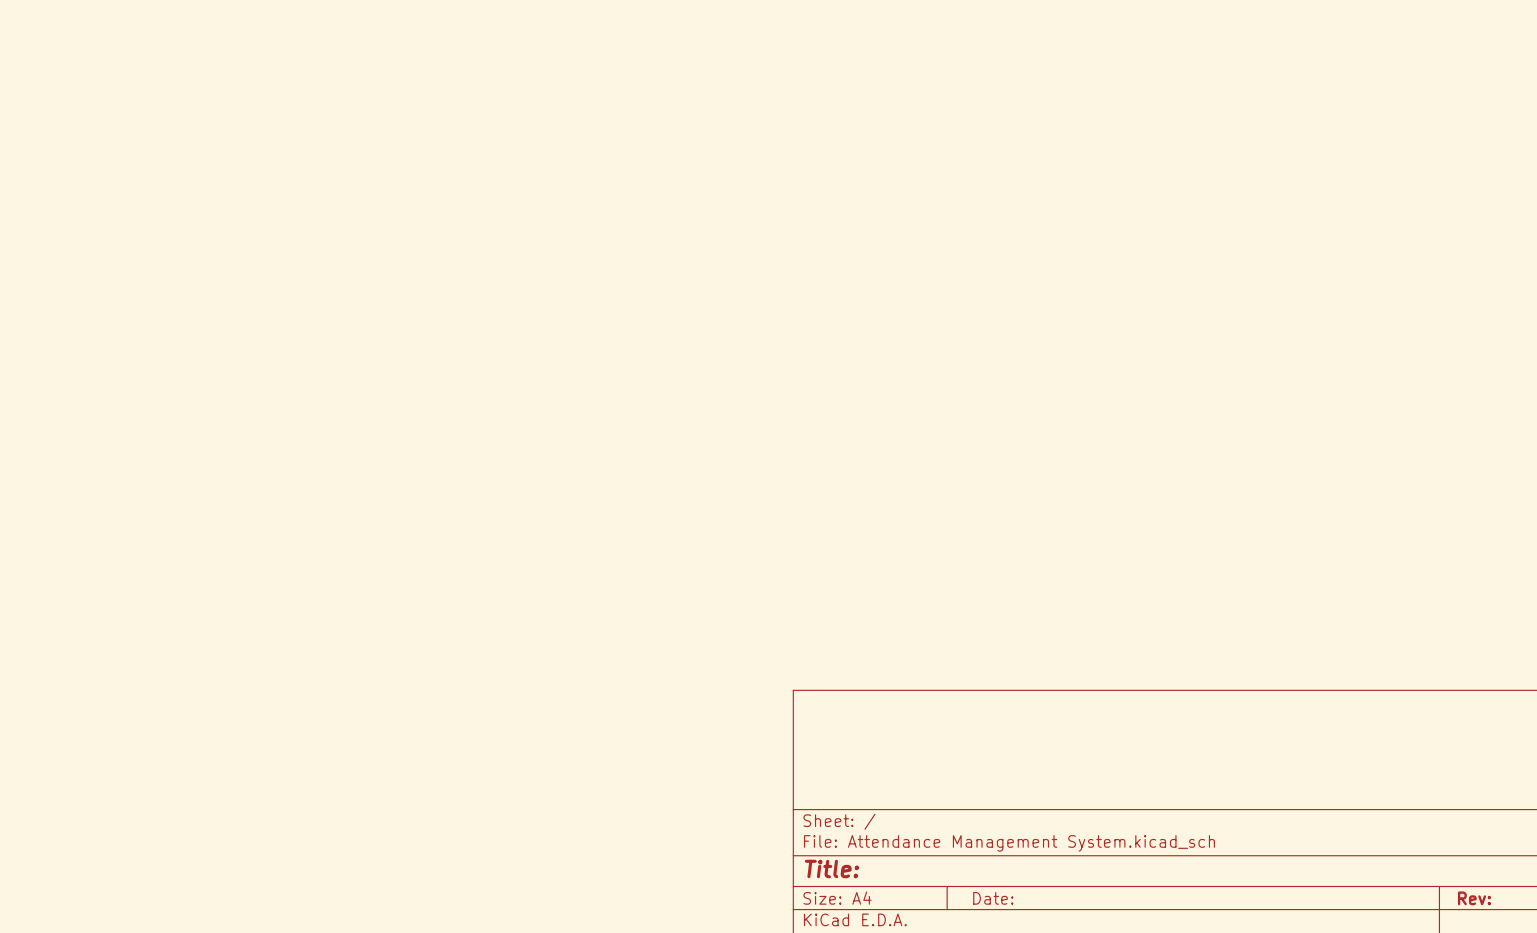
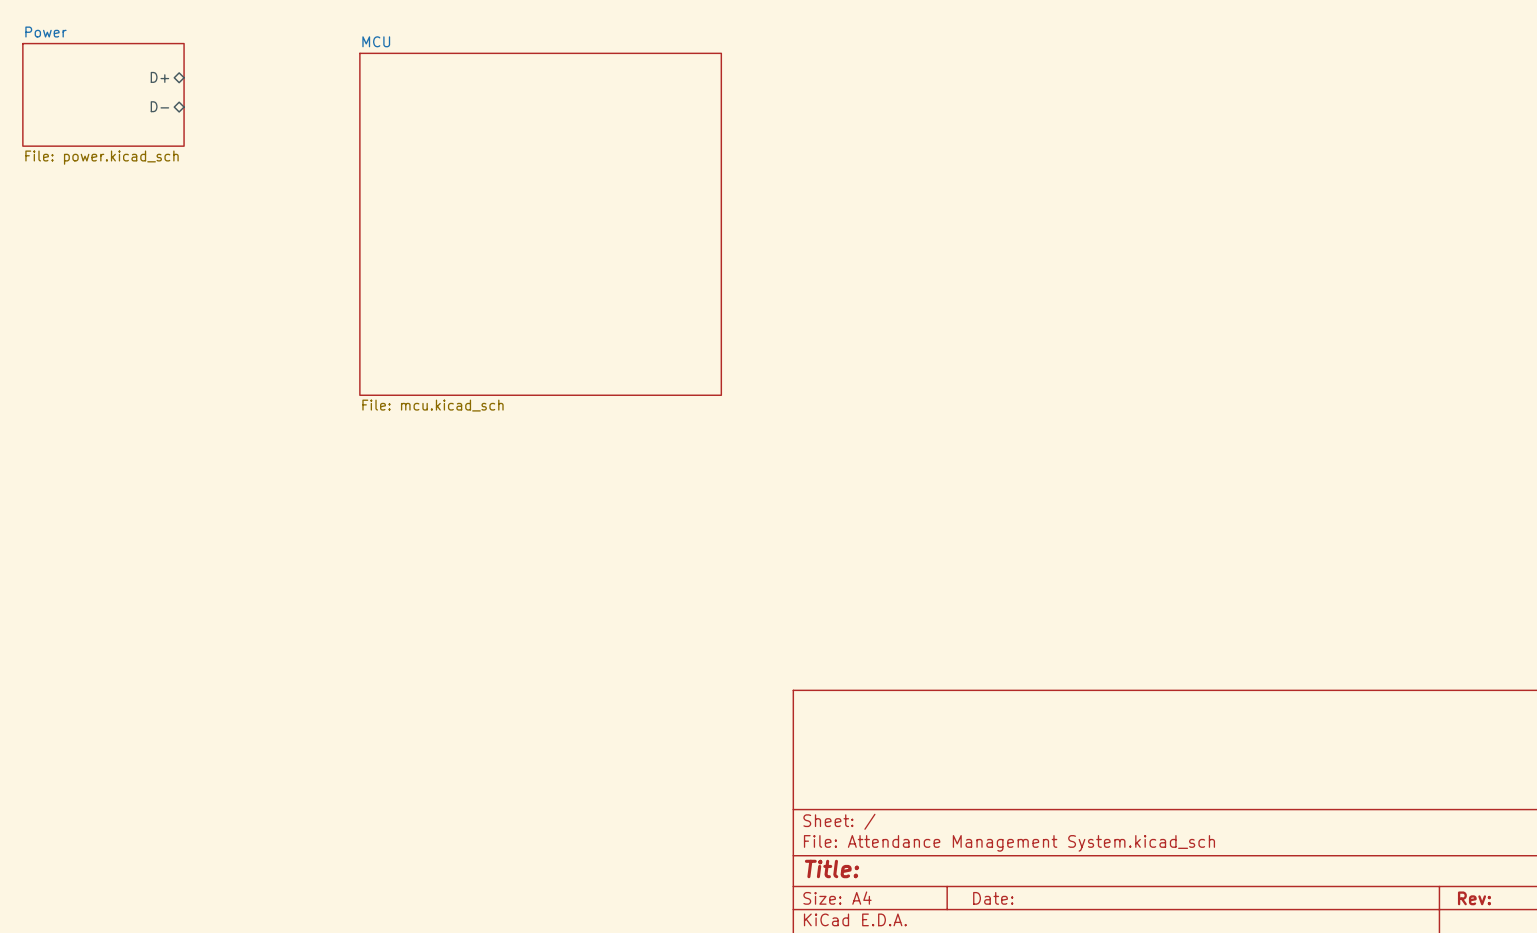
sheet pin: none -> D+ (159, 77)
sheet Power: none -> File: power.kicad_sch (103, 94)
sheet pin: none -> D- (159, 106)
sheet MCU: none -> File: mcu.kicad_sch (540, 224)

